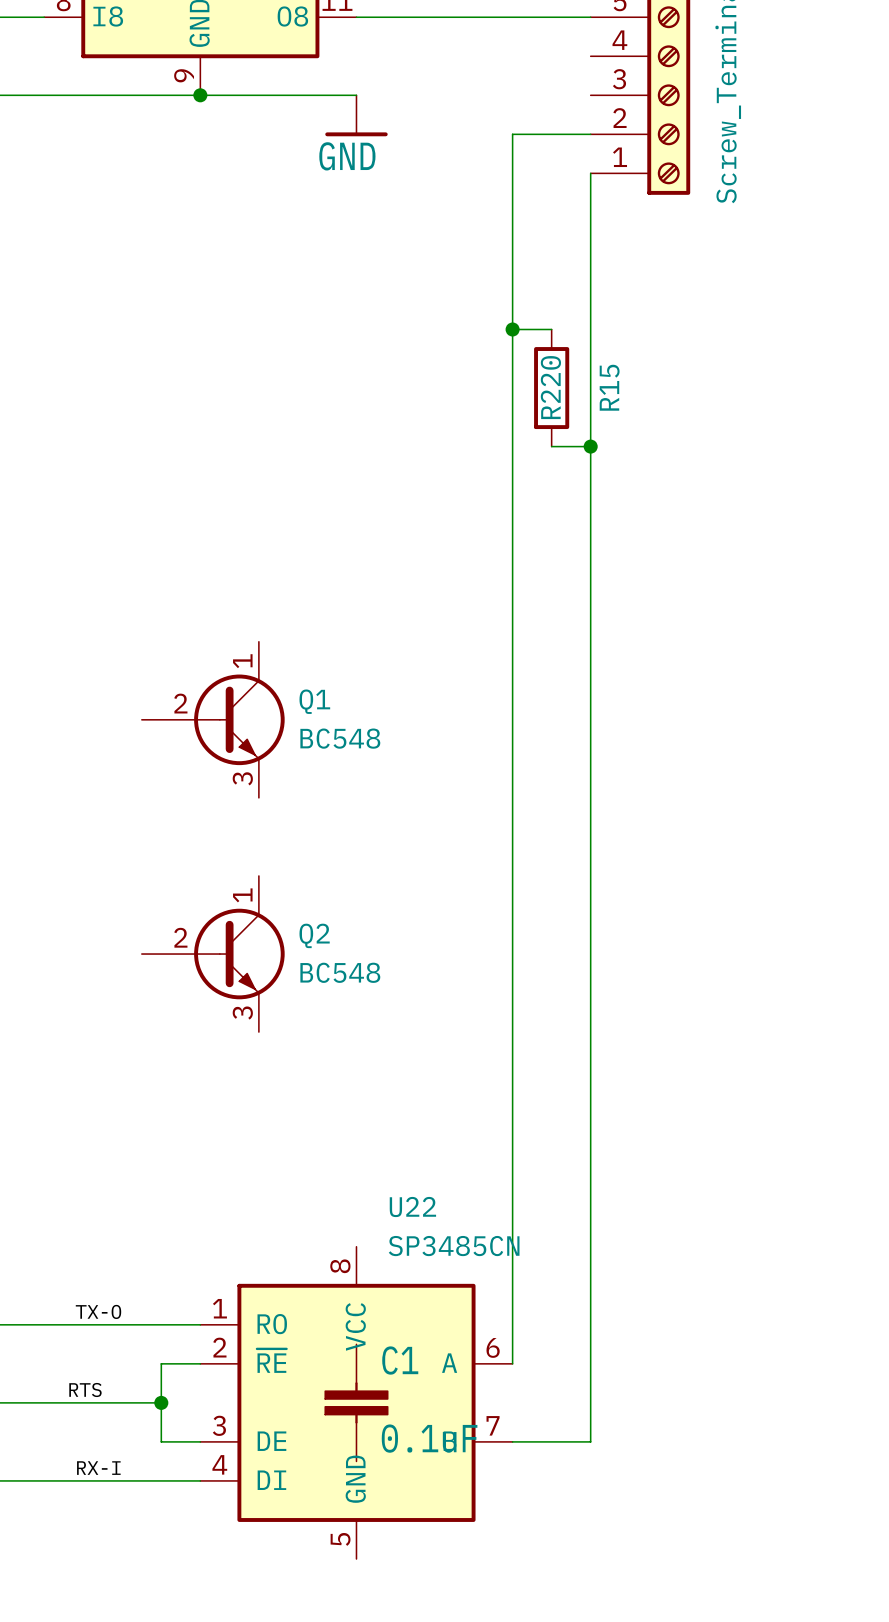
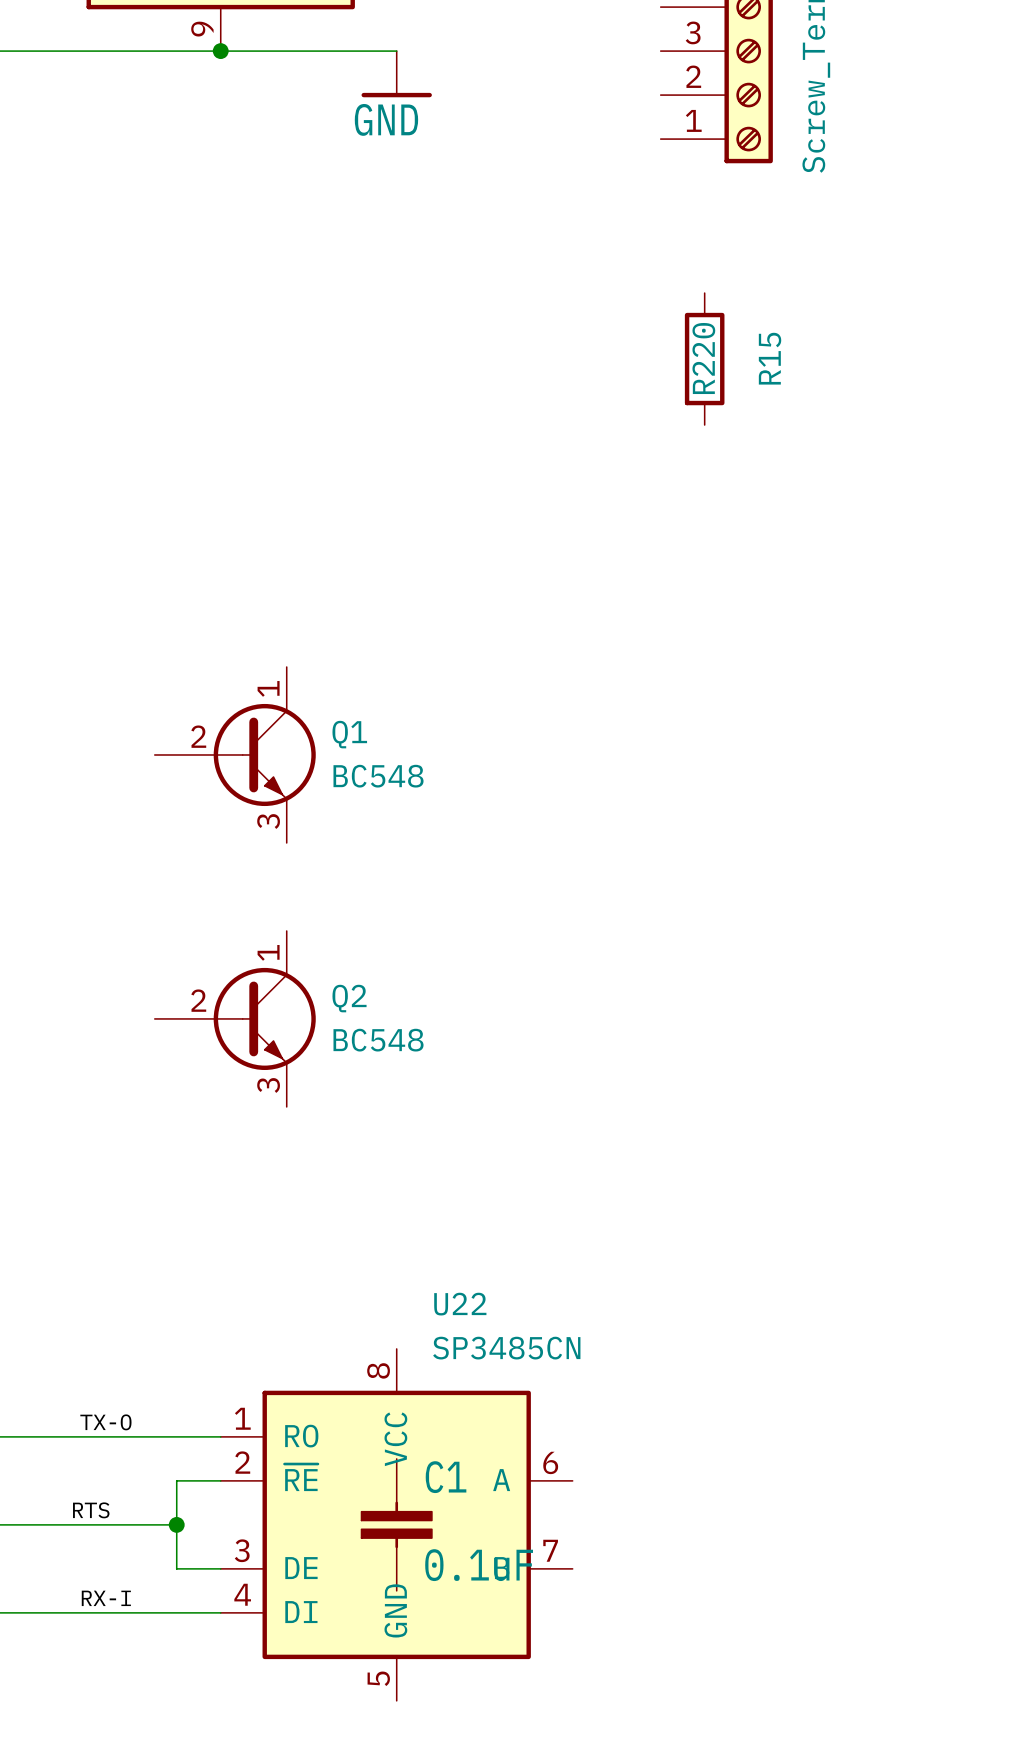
wire: (590, 134) (512, 134) (512, 1363) -> none
wire: (590, 173) (590, 1441) (512, 1441) -> none
wire: (512, 329) (551, 329) -> none
junction: (512, 329) -> none
R15 position: (551, 388) -> (704, 359)
wire: (551, 446) (590, 446) -> none
junction: (590, 446) -> none

